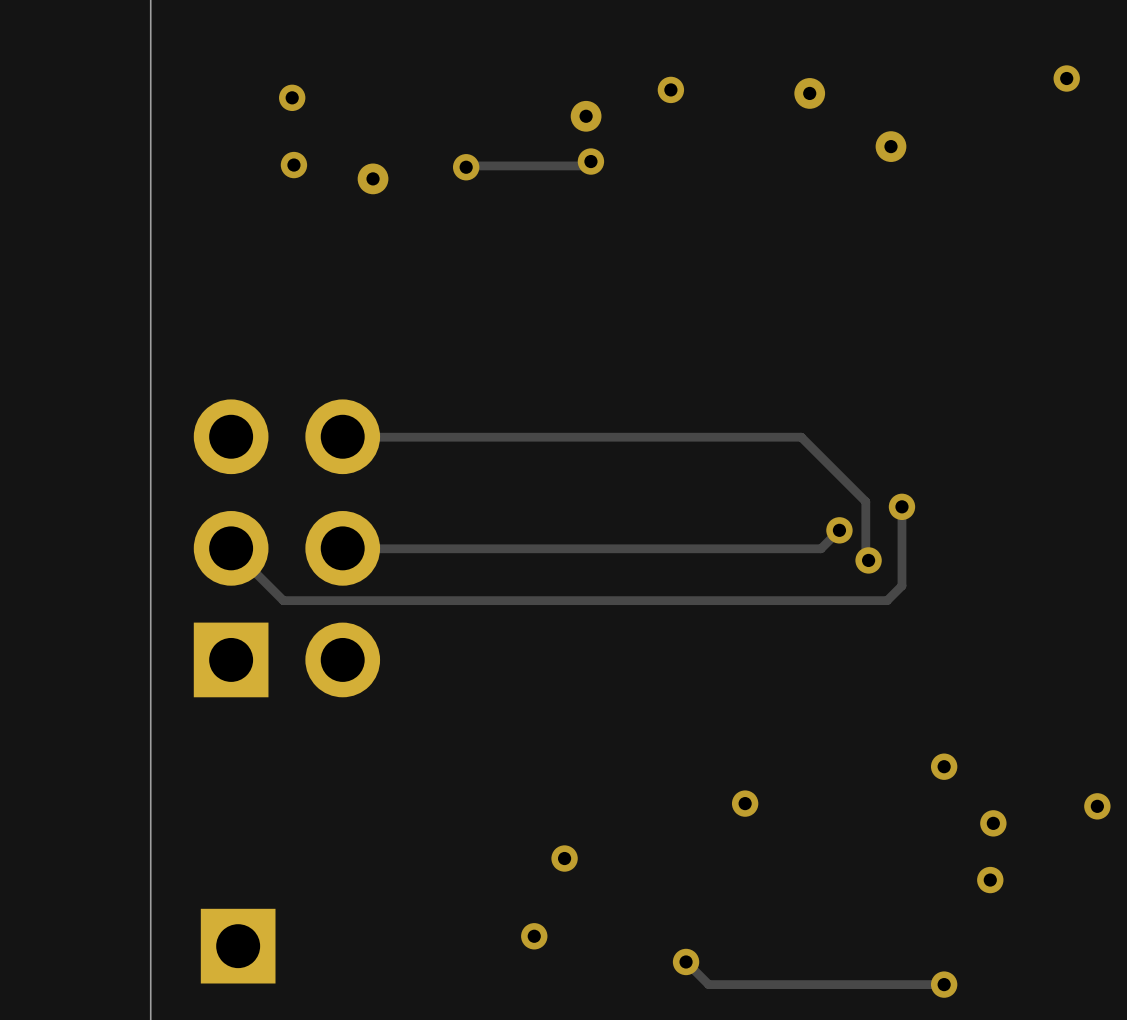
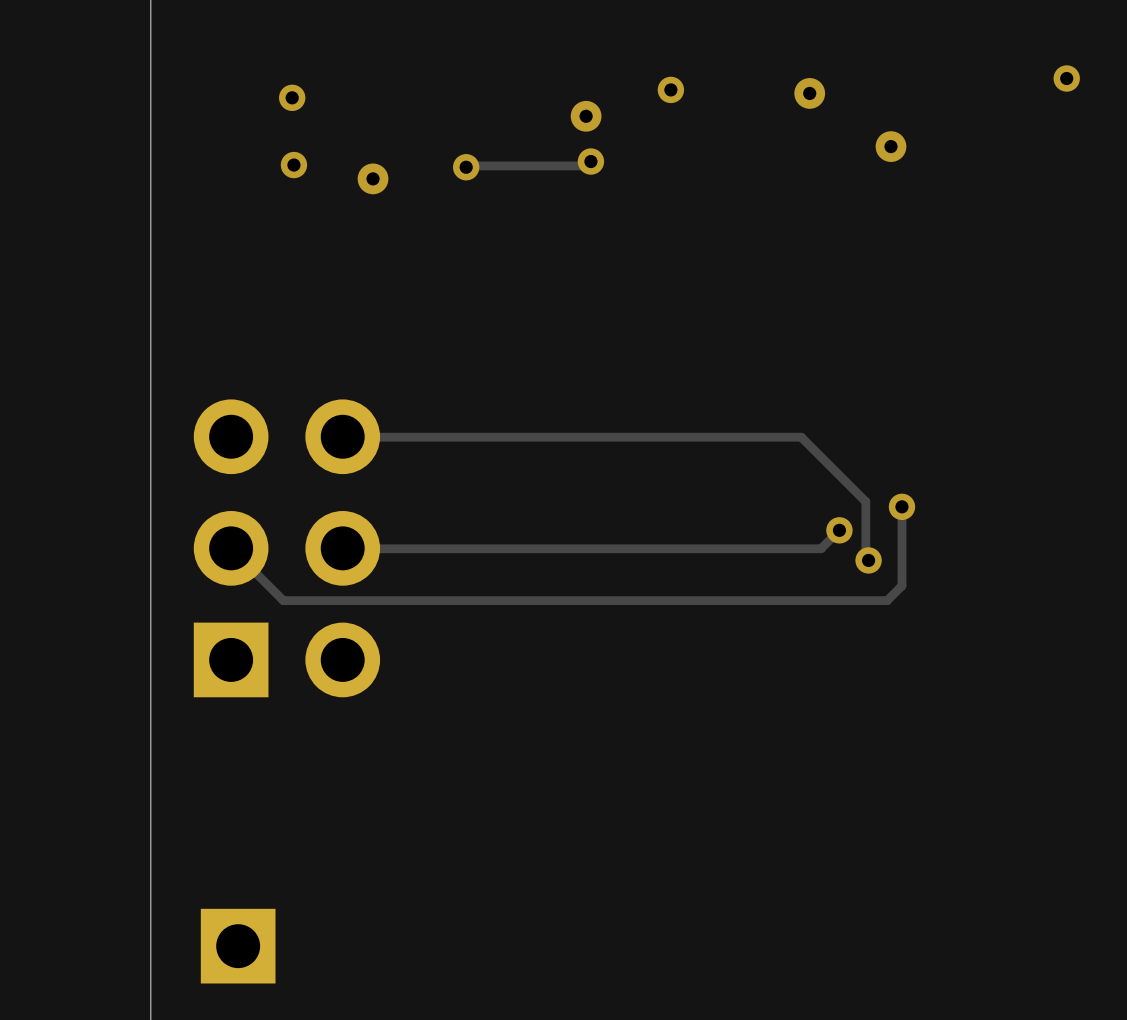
via: (944, 766) -> none
via: (745, 803) -> none
via: (1097, 806) -> none
via: (993, 823) -> none
via: (564, 858) -> none
via: (990, 880) -> none
via: (534, 936) -> none
track: (686, 961) (708, 984) (944, 984) -> none
via: (686, 961) -> none
via: (944, 984) -> none

